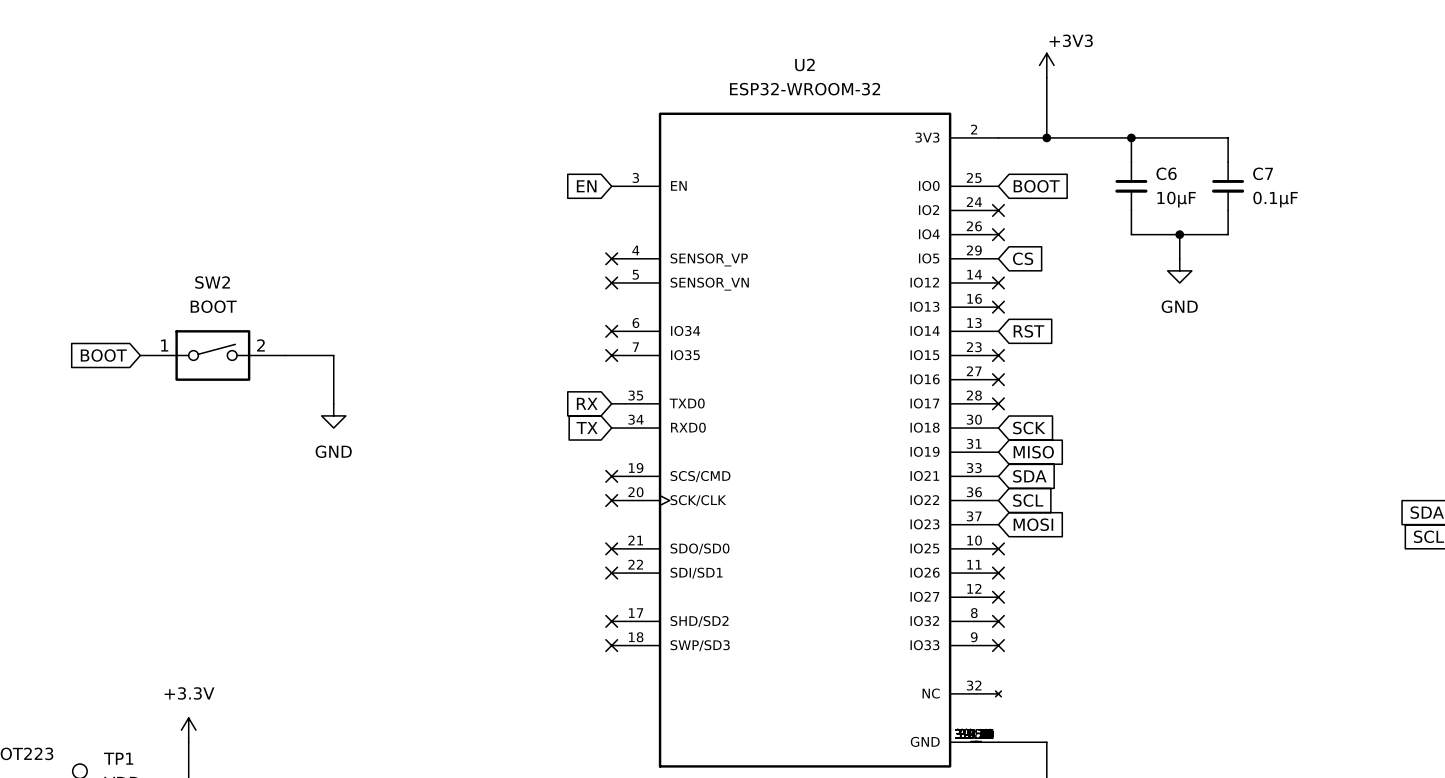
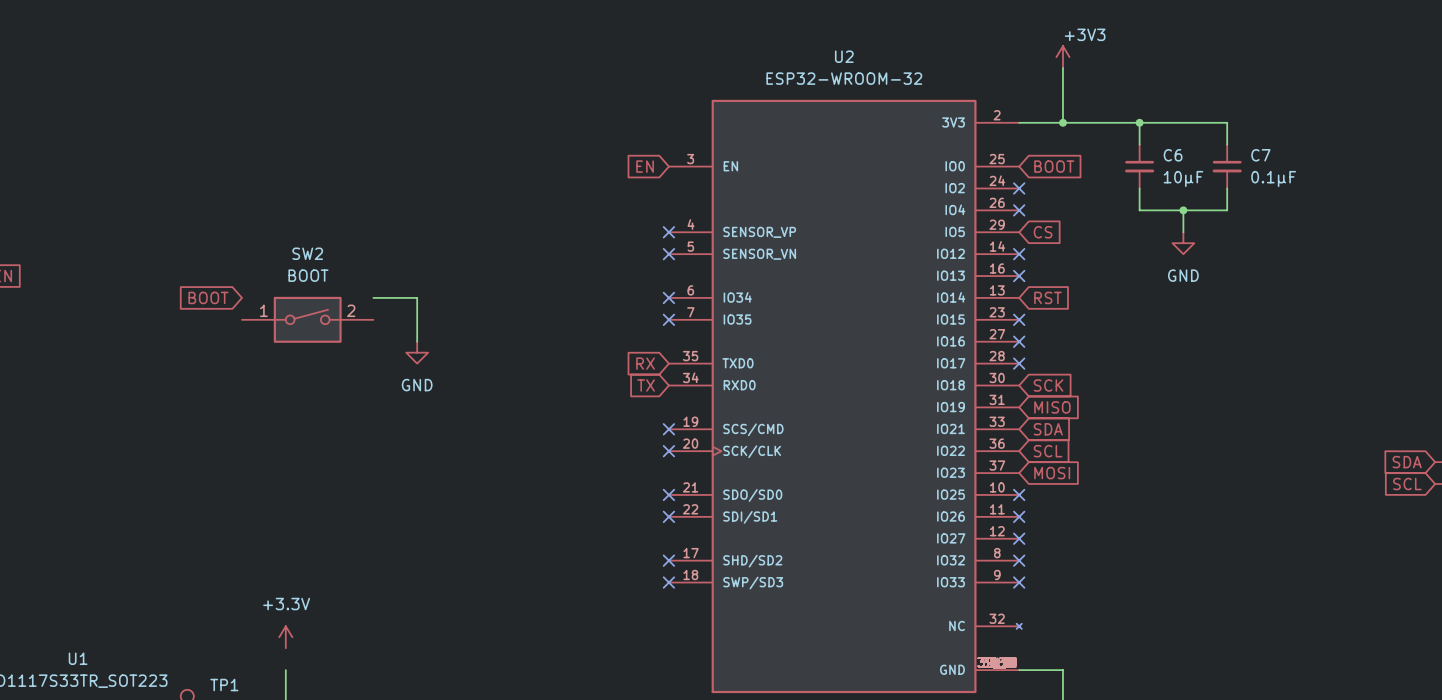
global label position: BOOT (103, 355) -> BOOT (208, 297)
wire: (285, 355) (333, 355) -> (373, 297) (417, 297) (417, 319)
power symbol position: GND (333, 415) -> GND (417, 352)
power symbol position: +3.3V (188, 730) -> +3.3V (285, 637)

